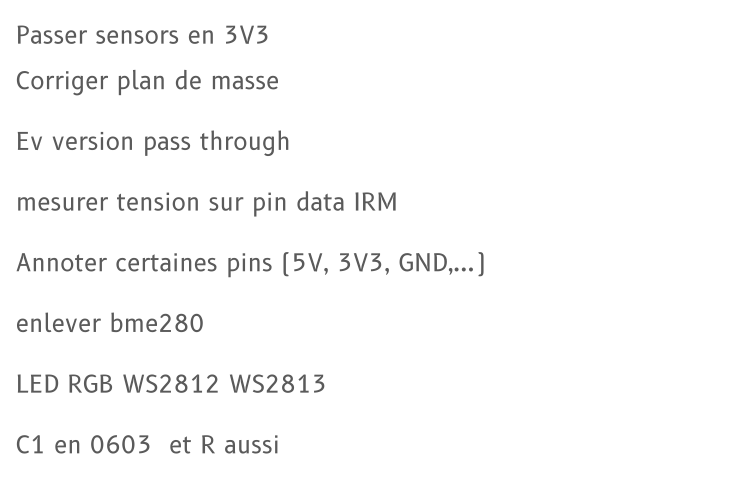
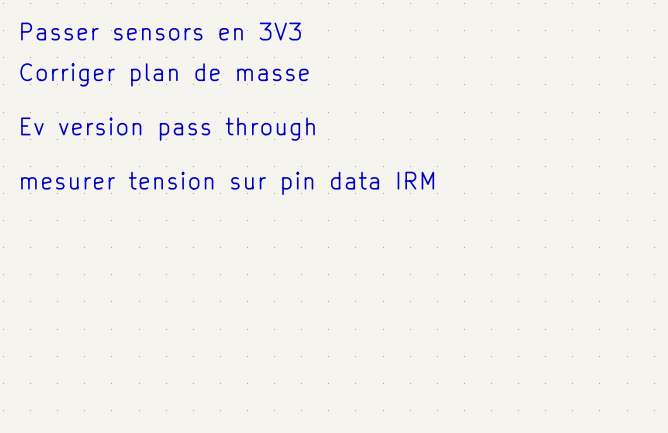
text: Annoter certaines pins (5V, 3V3, GND,...) (250, 264) -> none
text: enlever bme280 (109, 322) -> none
text: LED RGB WS2812 WS2813 (171, 383) -> none
text: C1 en 0603 et R aussi (147, 444) -> none

